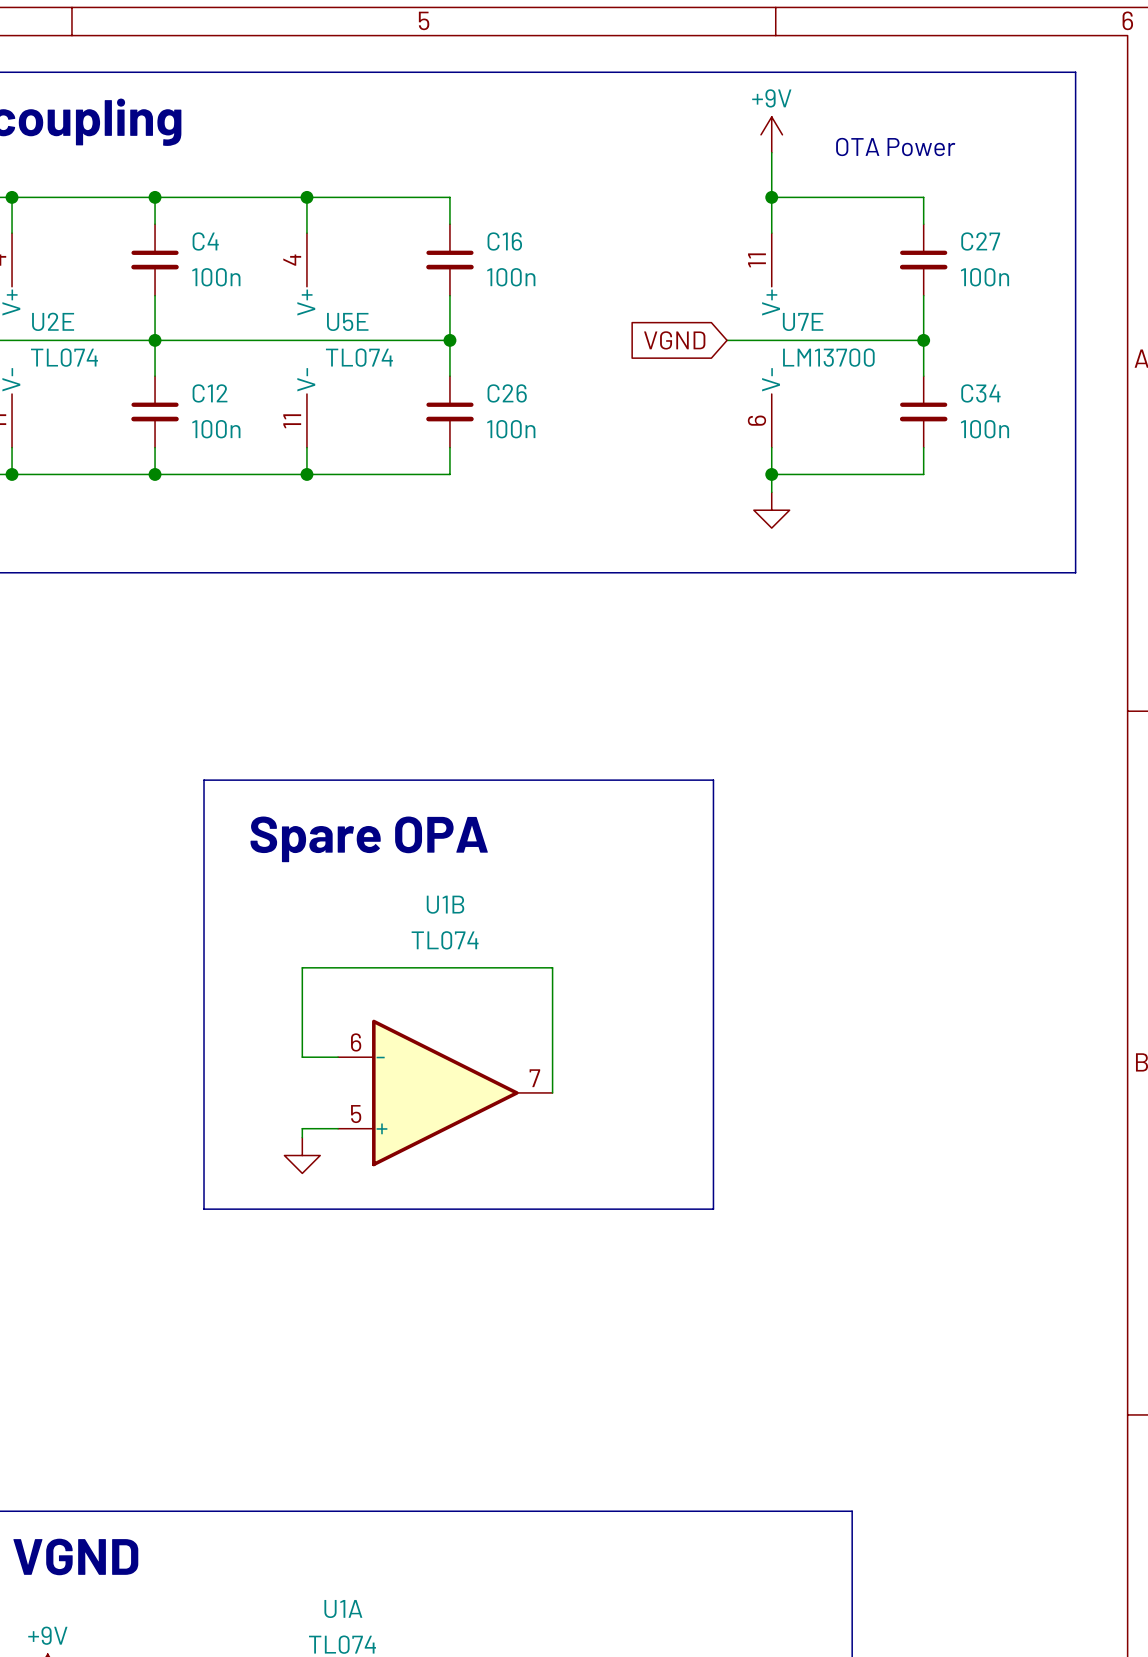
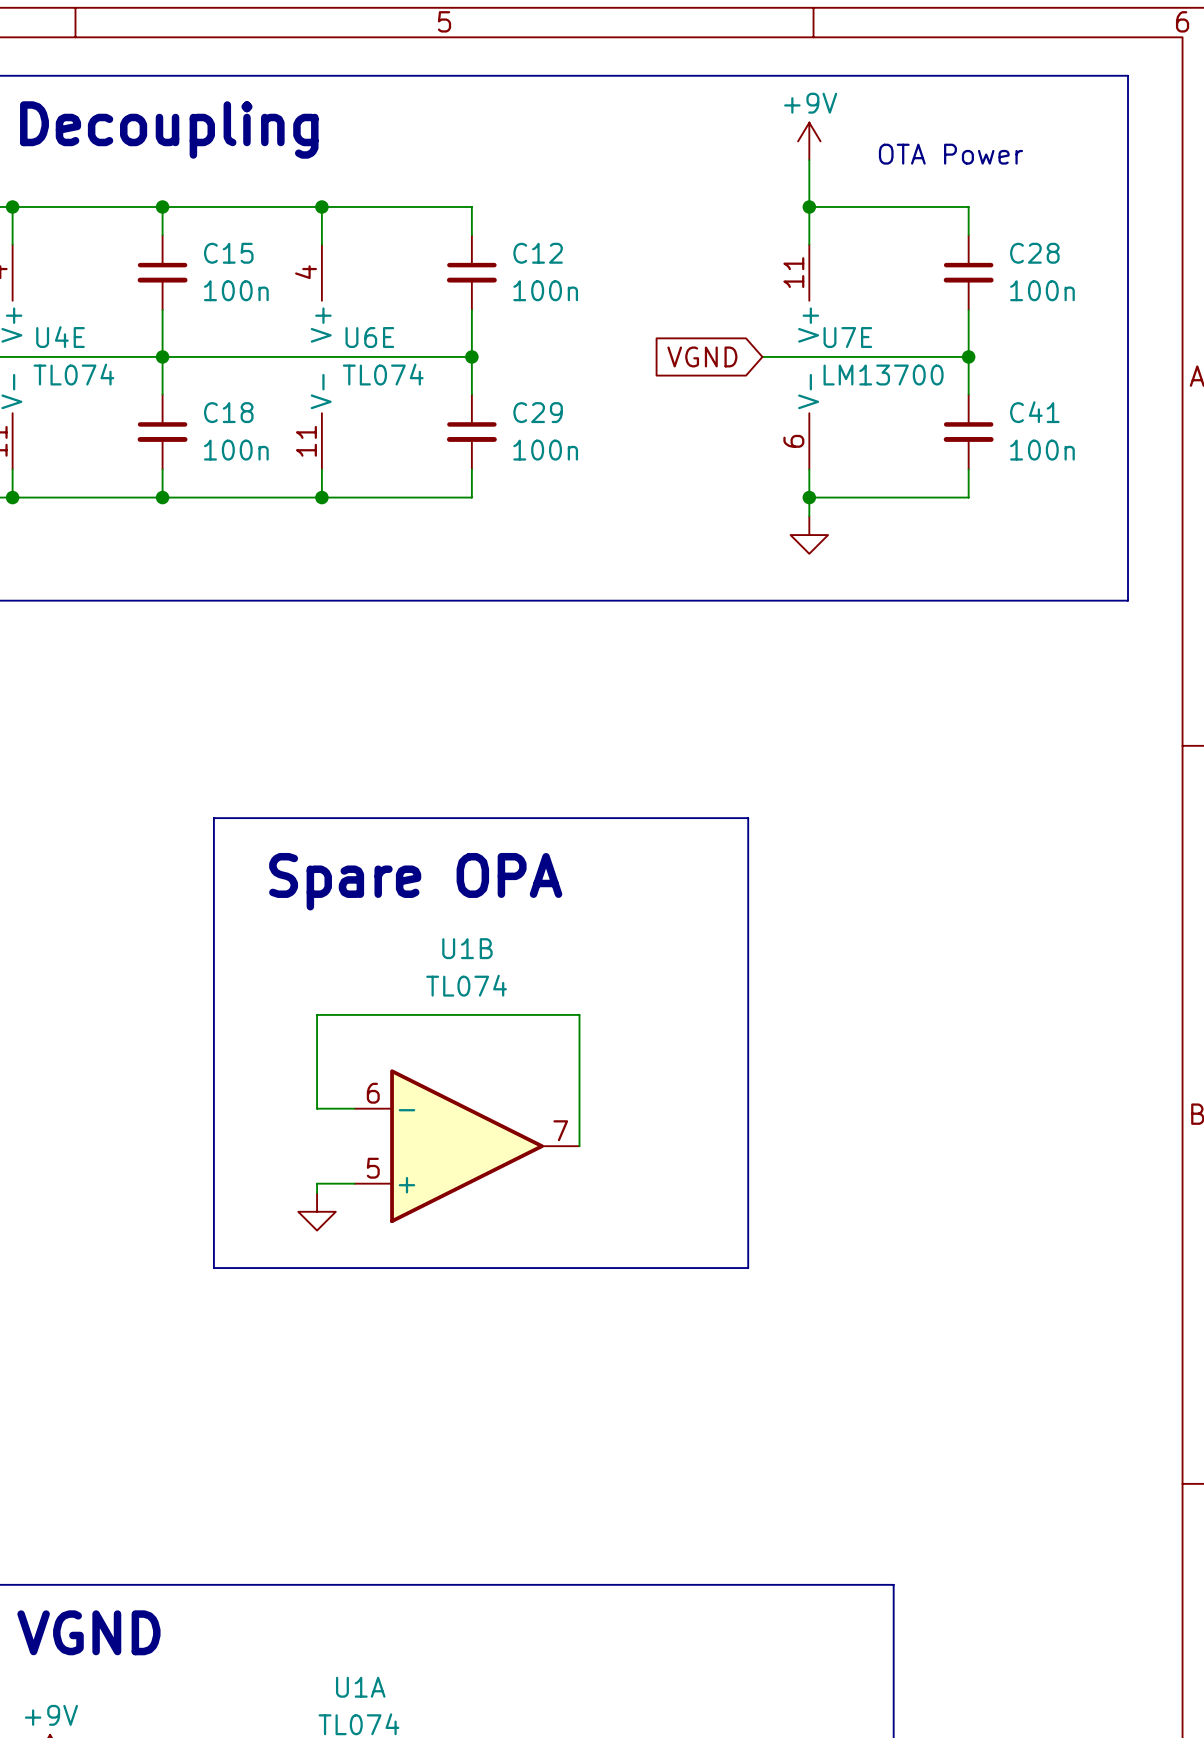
C4 name: C4 (205, 241) -> C15 (228, 253)
C16 name: C16 (504, 241) -> C12 (538, 253)
C27 name: C27 (980, 241) -> C28 (1034, 253)
U2E name: U2E (53, 321) -> U4E (60, 337)
U5E name: U5E (347, 321) -> U6E (369, 337)
C12 name: C12 (210, 393) -> C18 (228, 412)
C26 name: C26 (507, 393) -> C29 (538, 412)
C34 name: C34 (980, 393) -> C41 (1034, 412)

